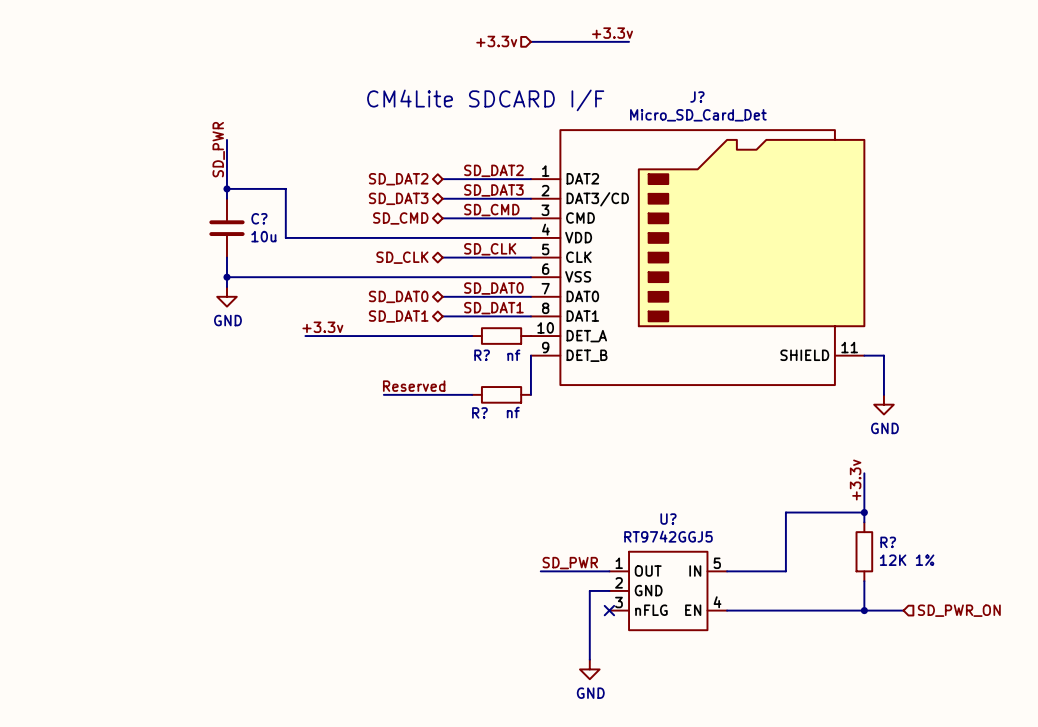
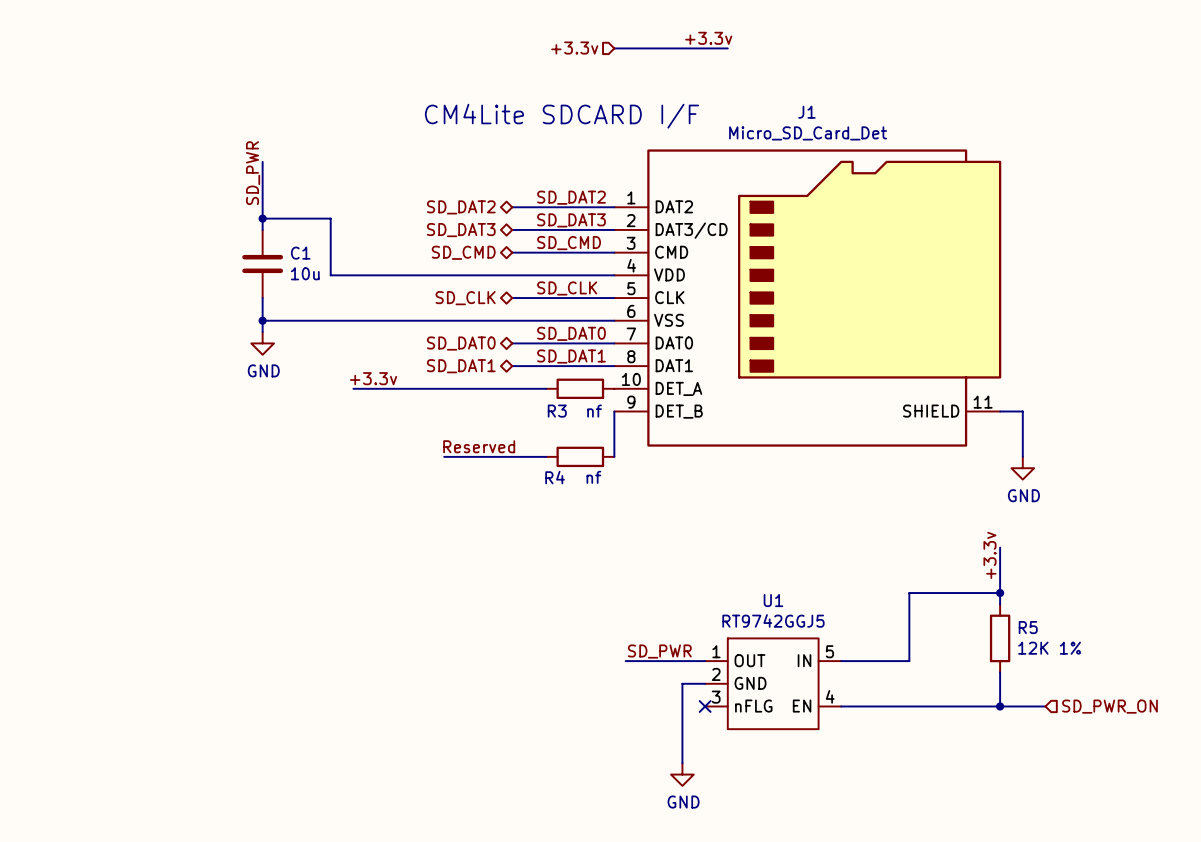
J? name: J? (697, 96) -> J1 (806, 112)
C? name: C? (259, 218) -> C1 (300, 253)
R? name: R? (482, 355) -> R3 (557, 411)
R? name: R? (479, 412) -> R4 (555, 477)
U? name: U? (668, 519) -> U1 (773, 600)
R? name: R? (888, 542) -> R5 (1028, 627)

